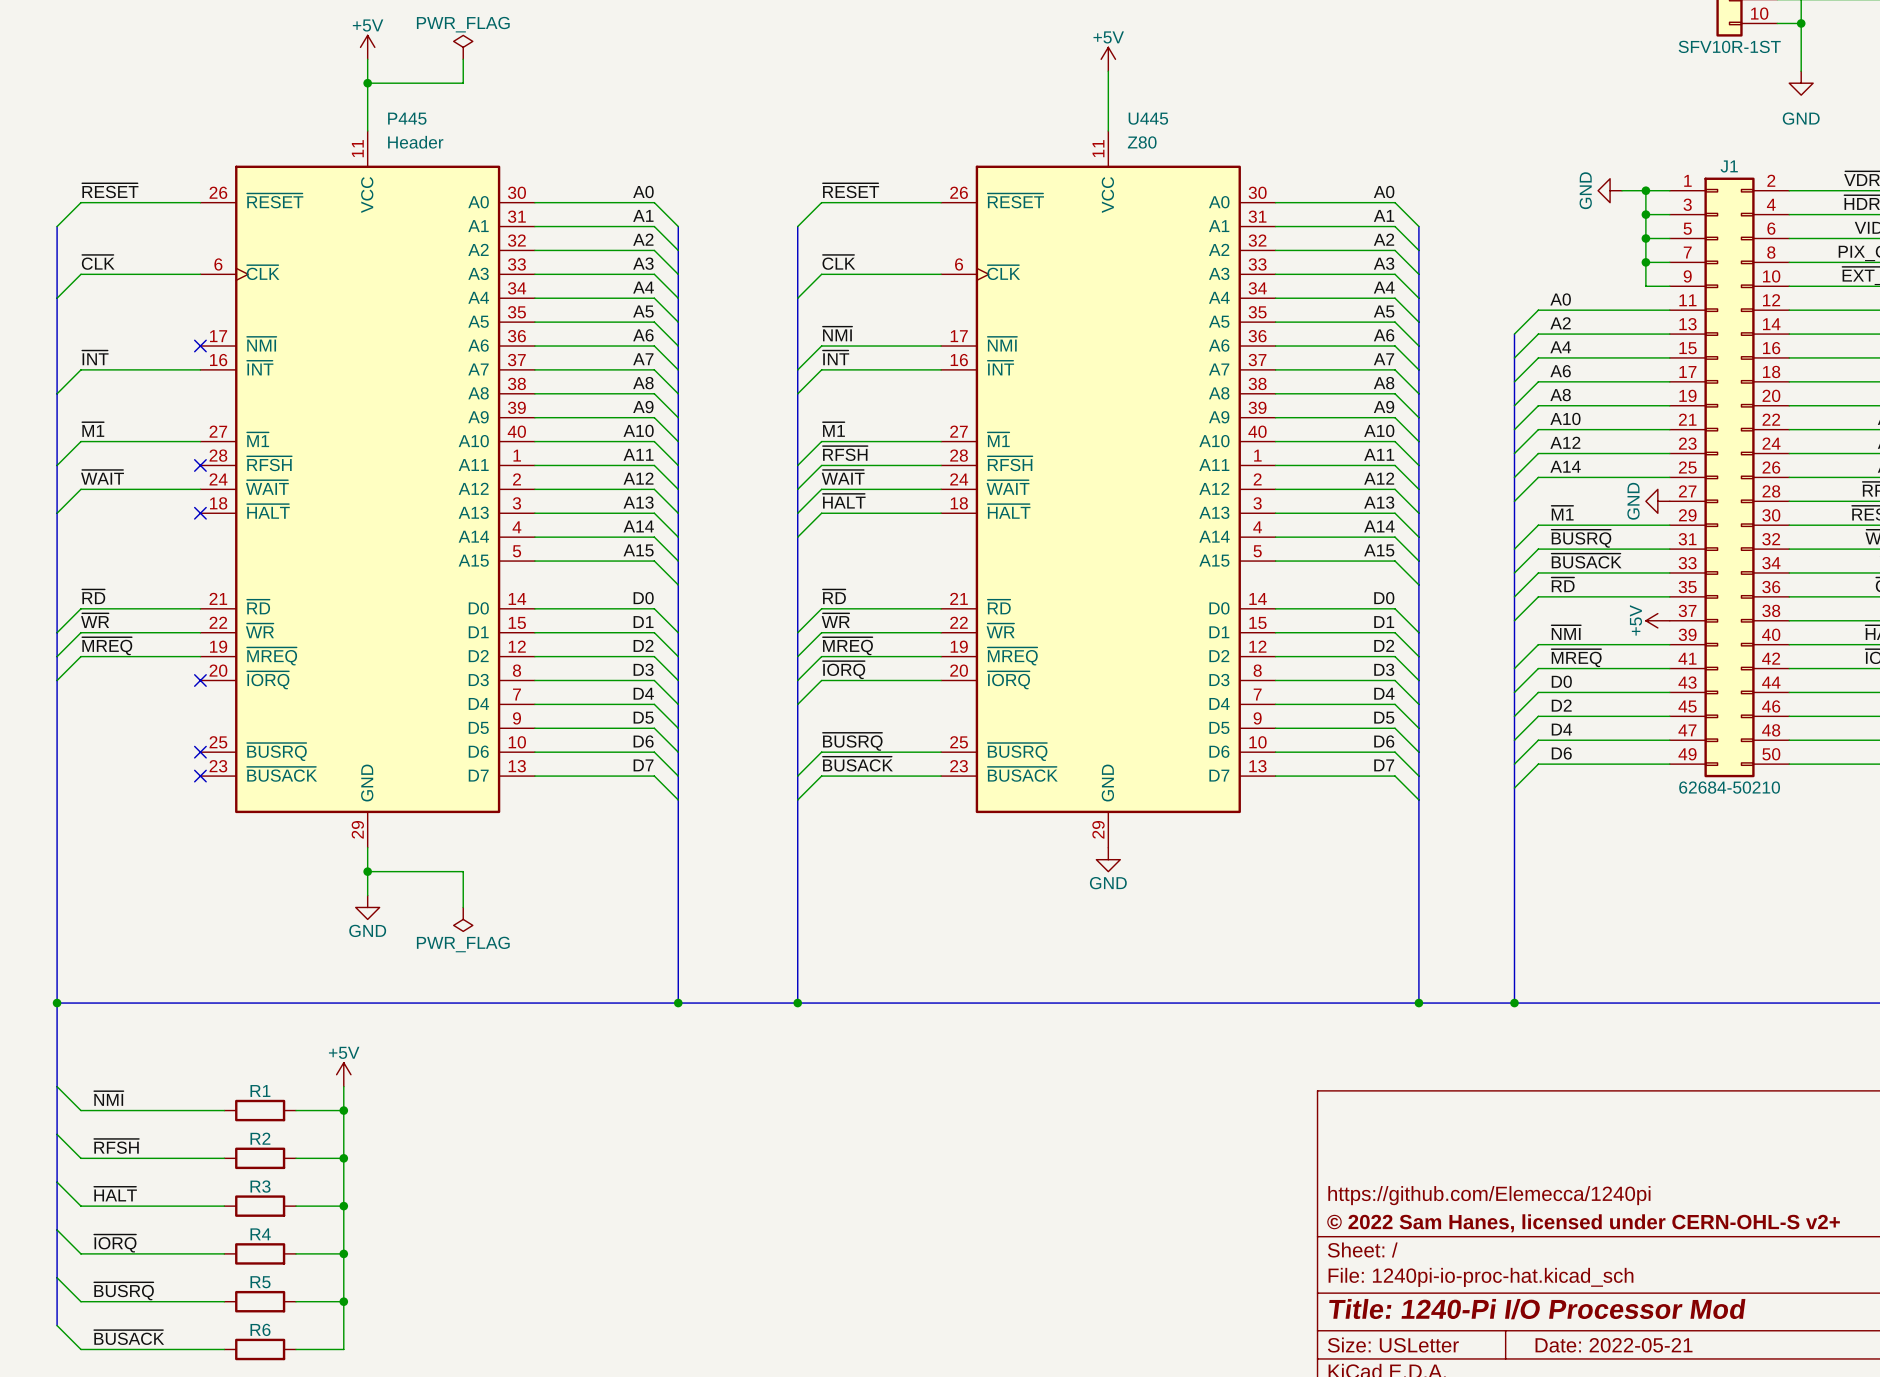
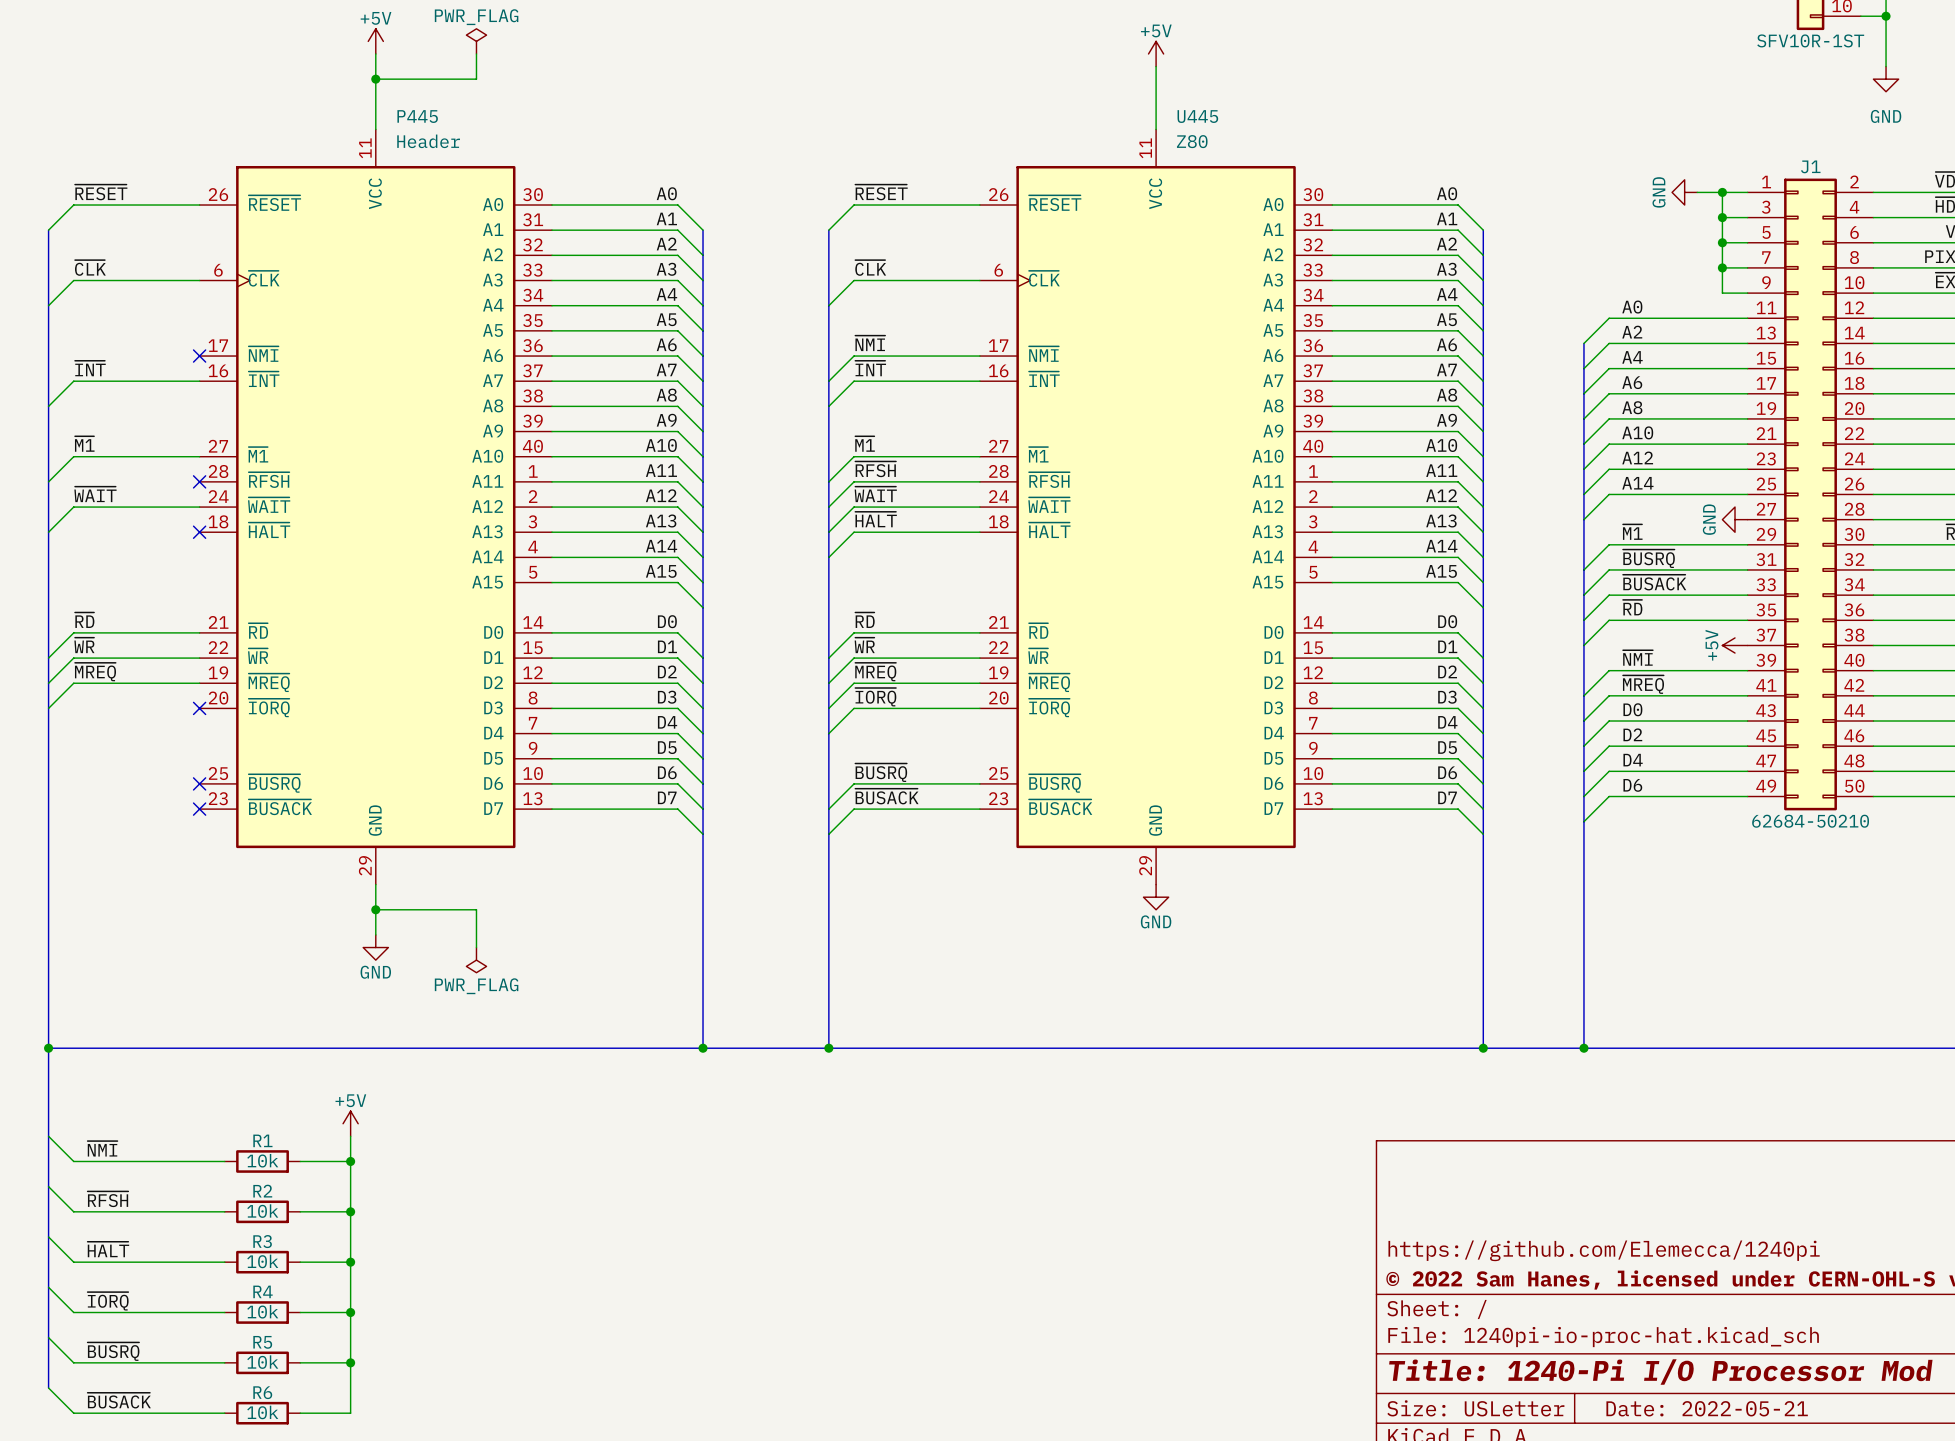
R1 value: none -> 10k (262, 1160)
R2 value: none -> 10k (262, 1211)
R3 value: none -> 10k (262, 1261)
R4 value: none -> 10k (262, 1311)
R5 value: none -> 10k (262, 1362)
R6 value: none -> 10k (262, 1412)

